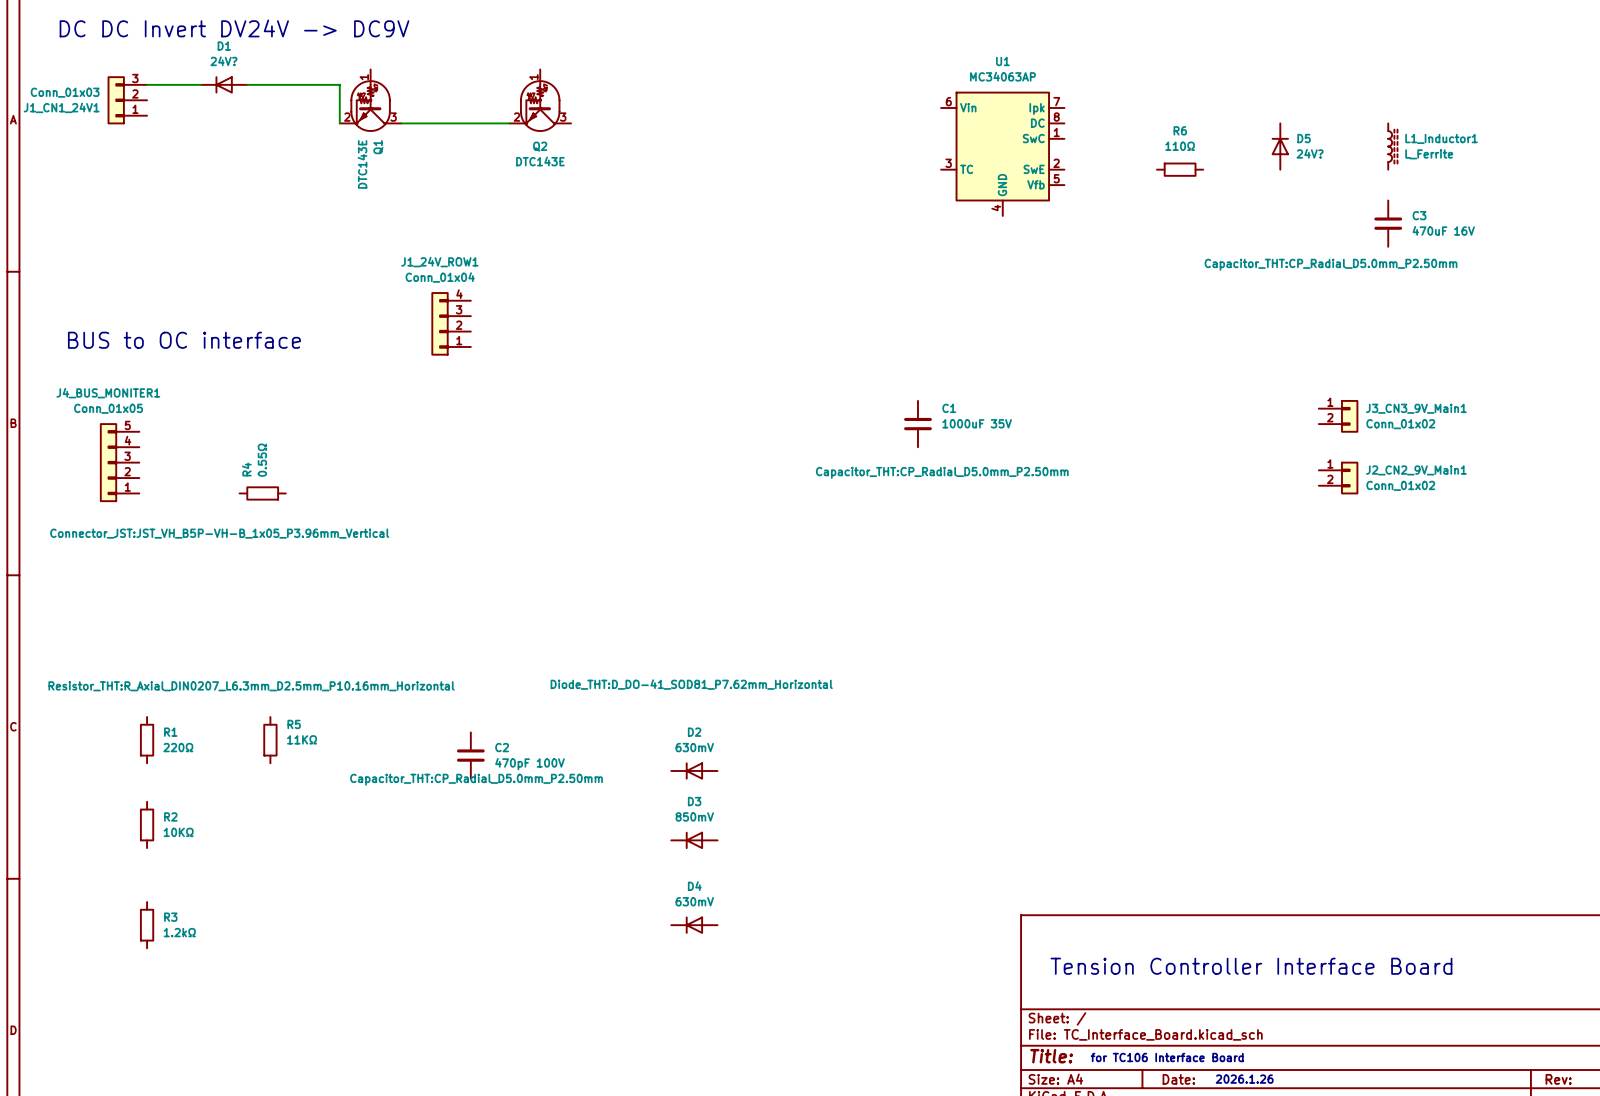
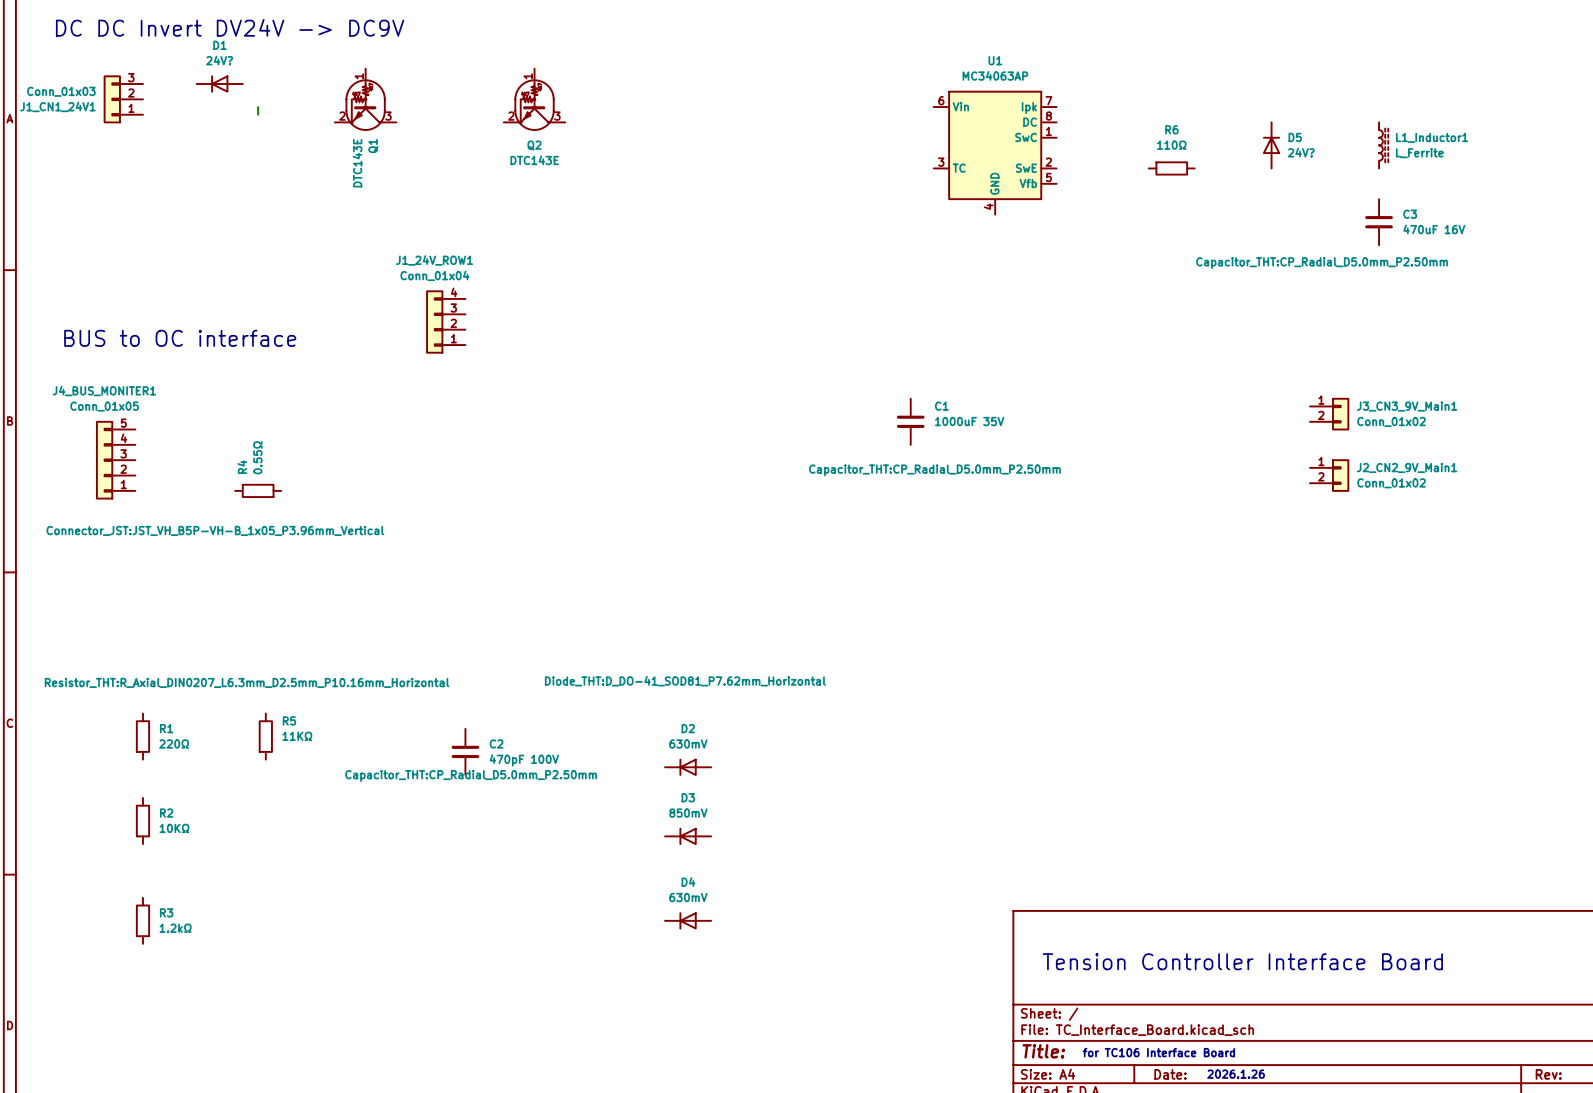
wire: (147, 84) (201, 84) -> none
wire: (247, 84) (339, 84) (339, 123) -> none
wire: none -> (258, 107) (258, 114)
wire: (401, 123) (509, 123) -> none

